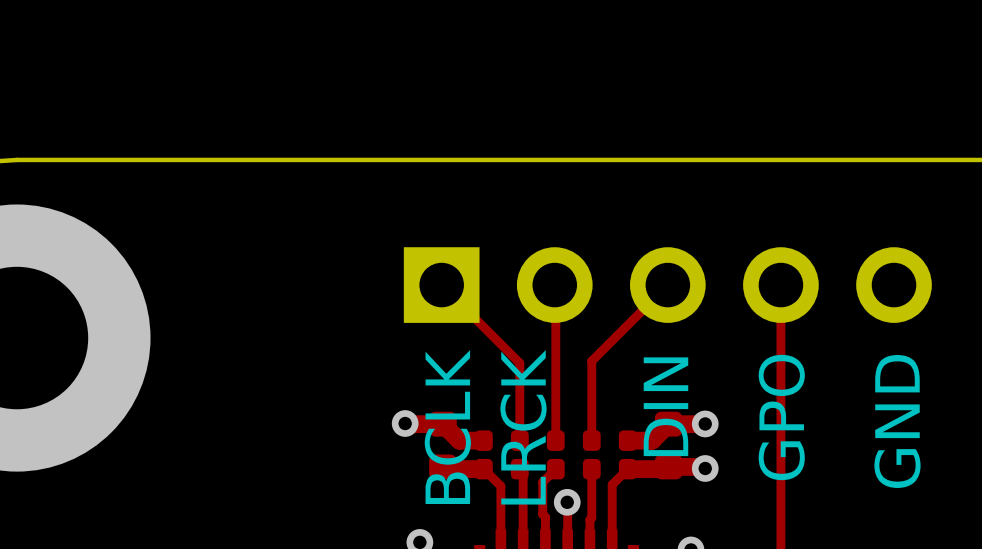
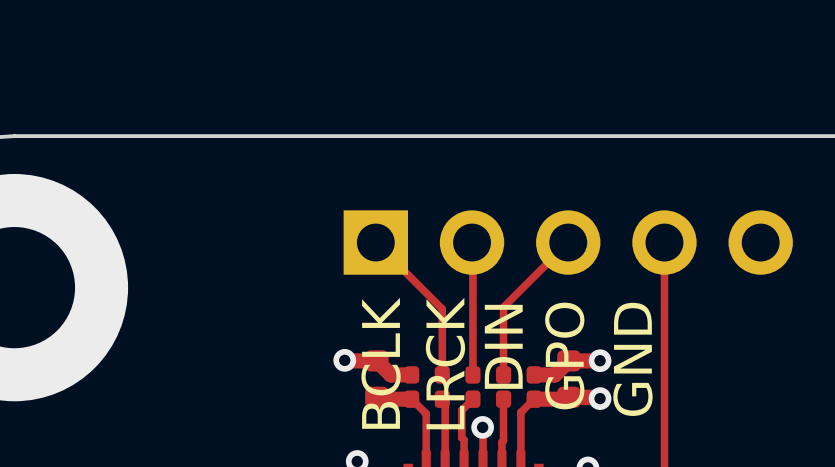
text: DIN (665, 406) -> GPO (564, 355)
text: none -> DIN (503, 346)
text: GPO (781, 417) -> GND (632, 359)
text: GND (897, 421) -> none

